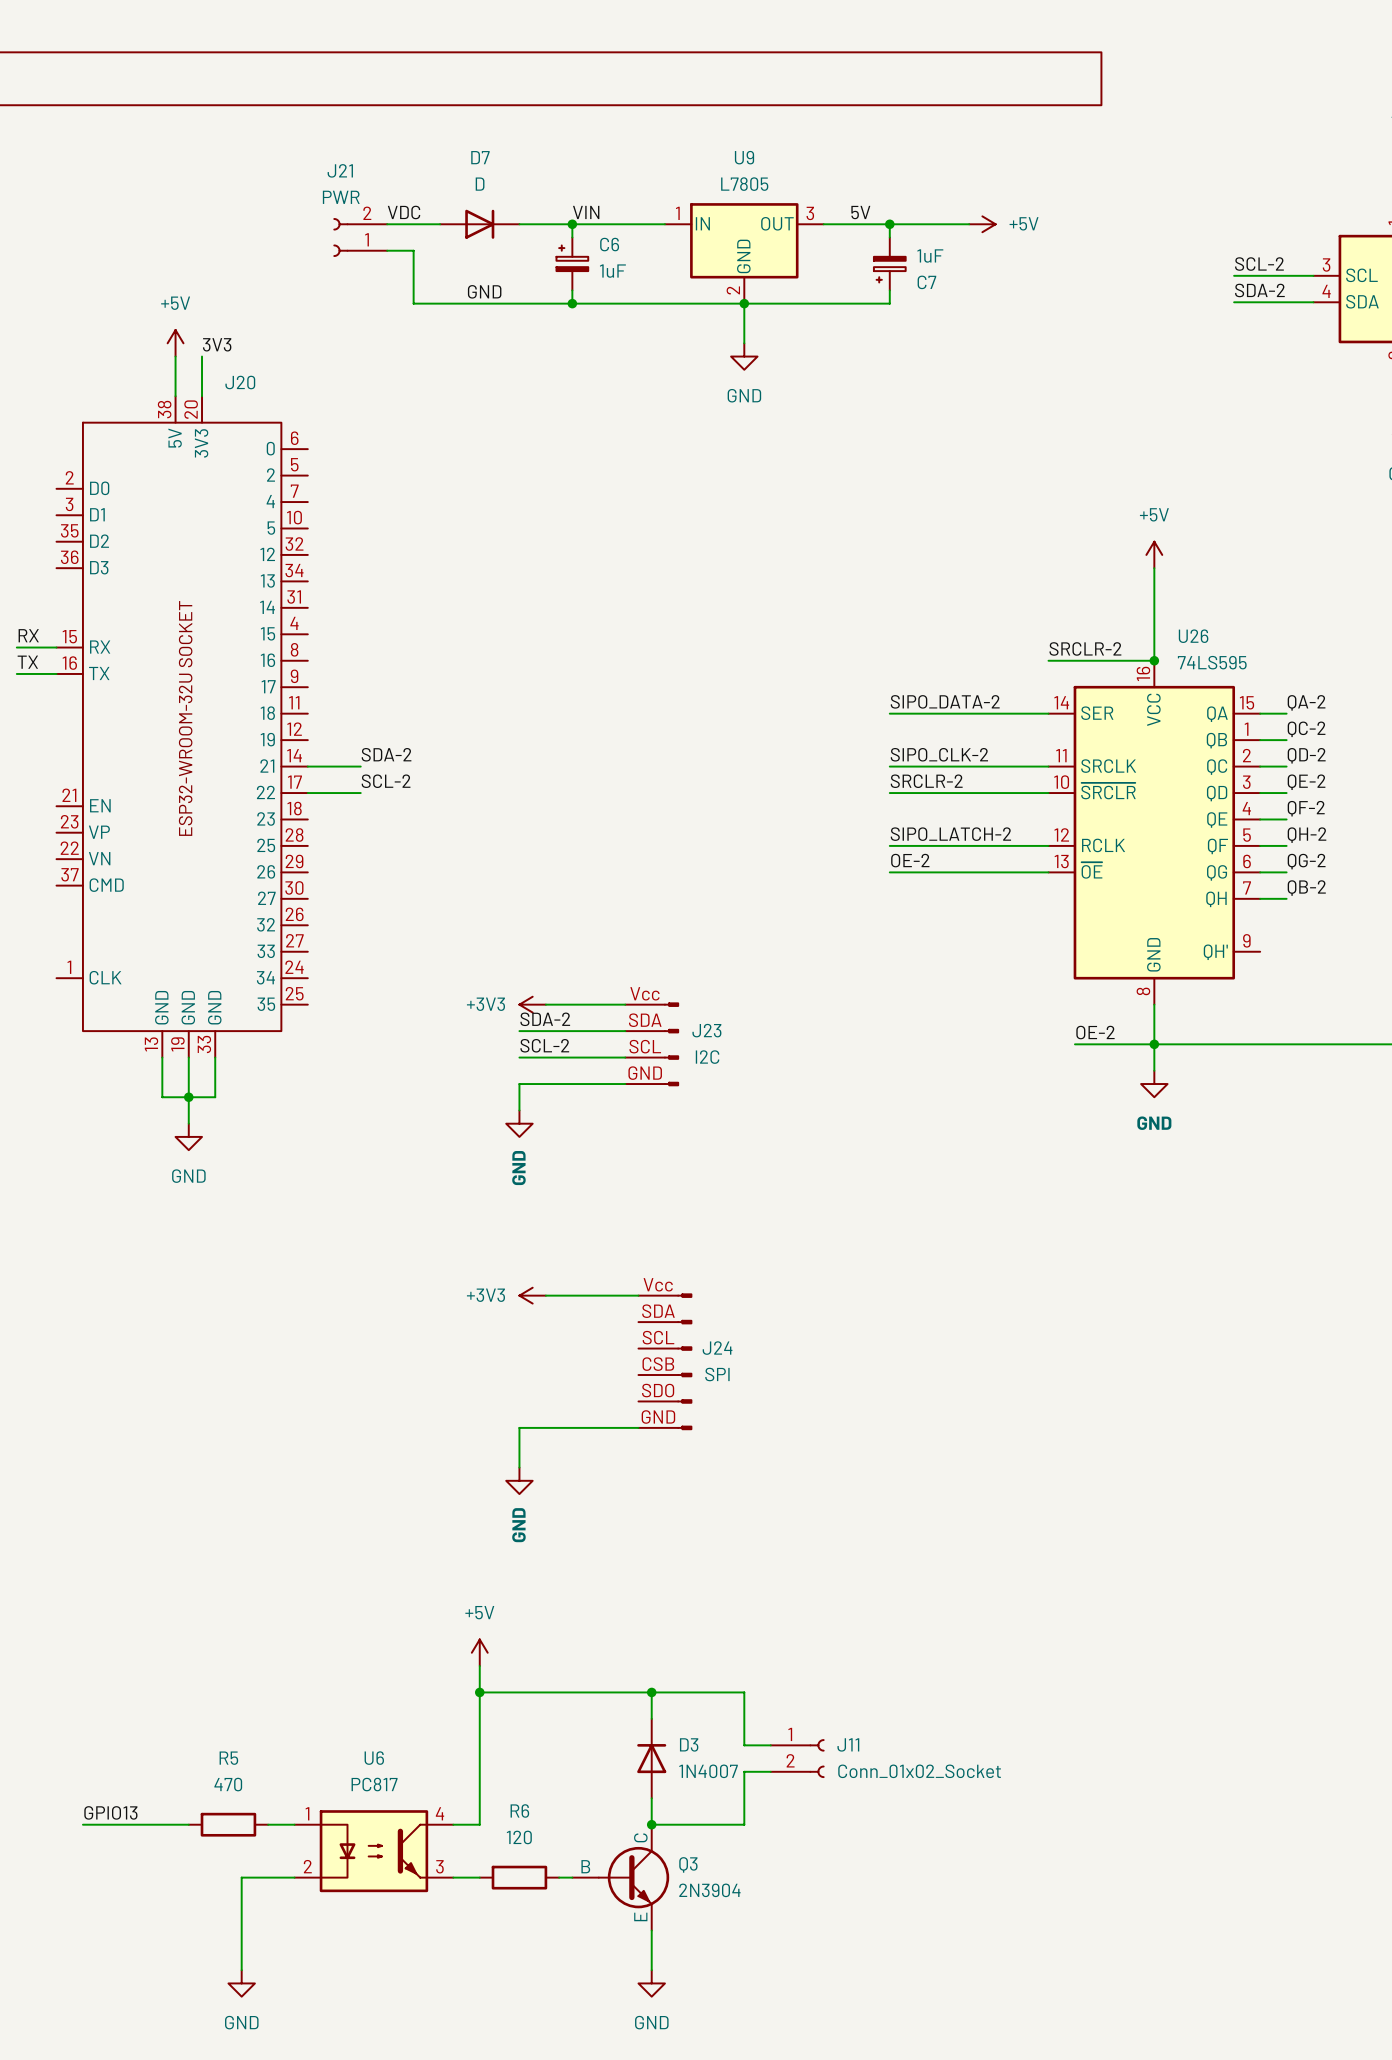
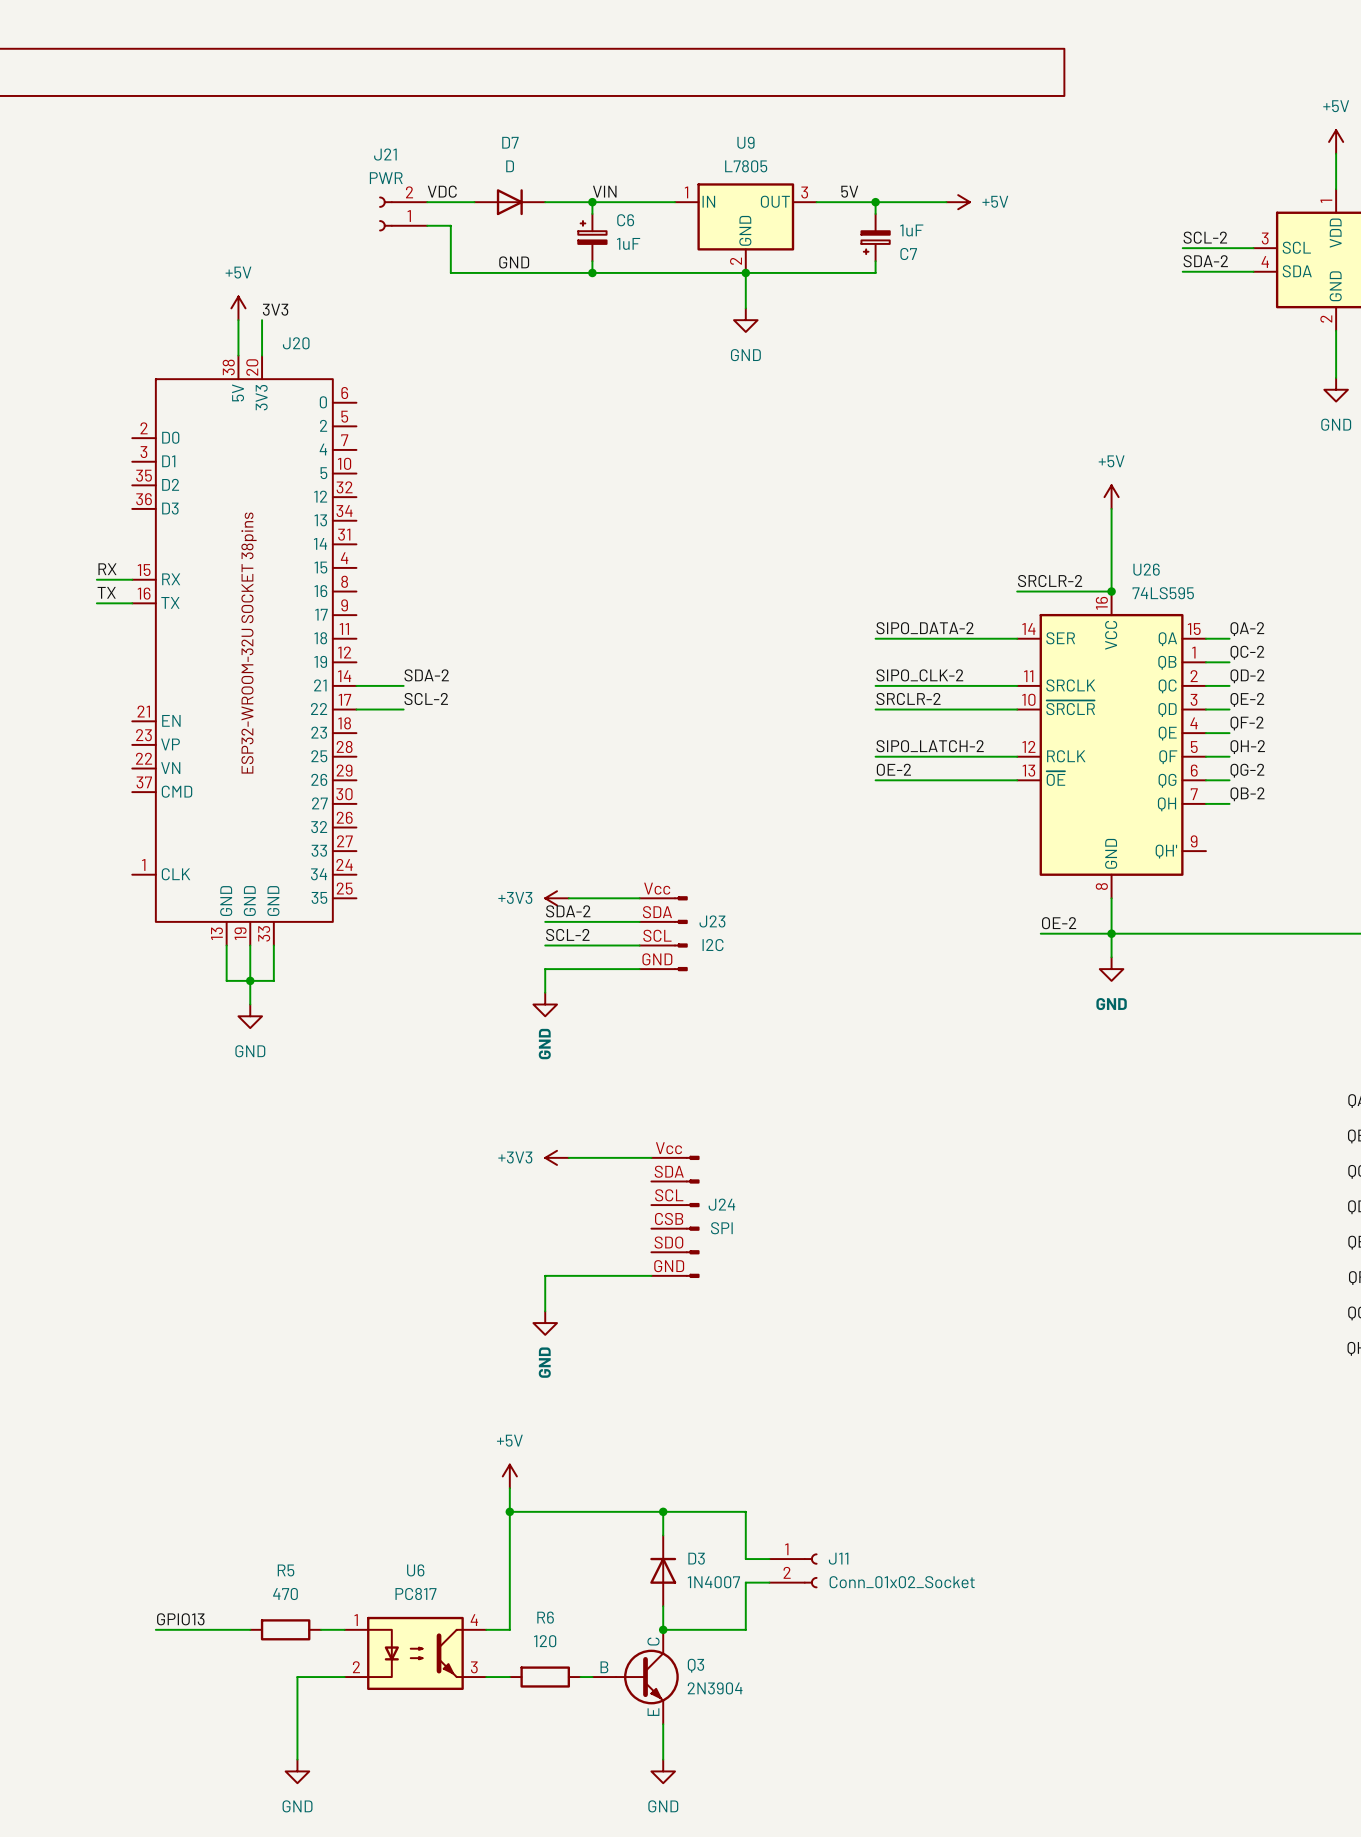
J20 text: ESP32-WROOM-32U SOCKET (185, 718) -> ESP32-WROOM-32U SOCKET 38pins (249, 643)

